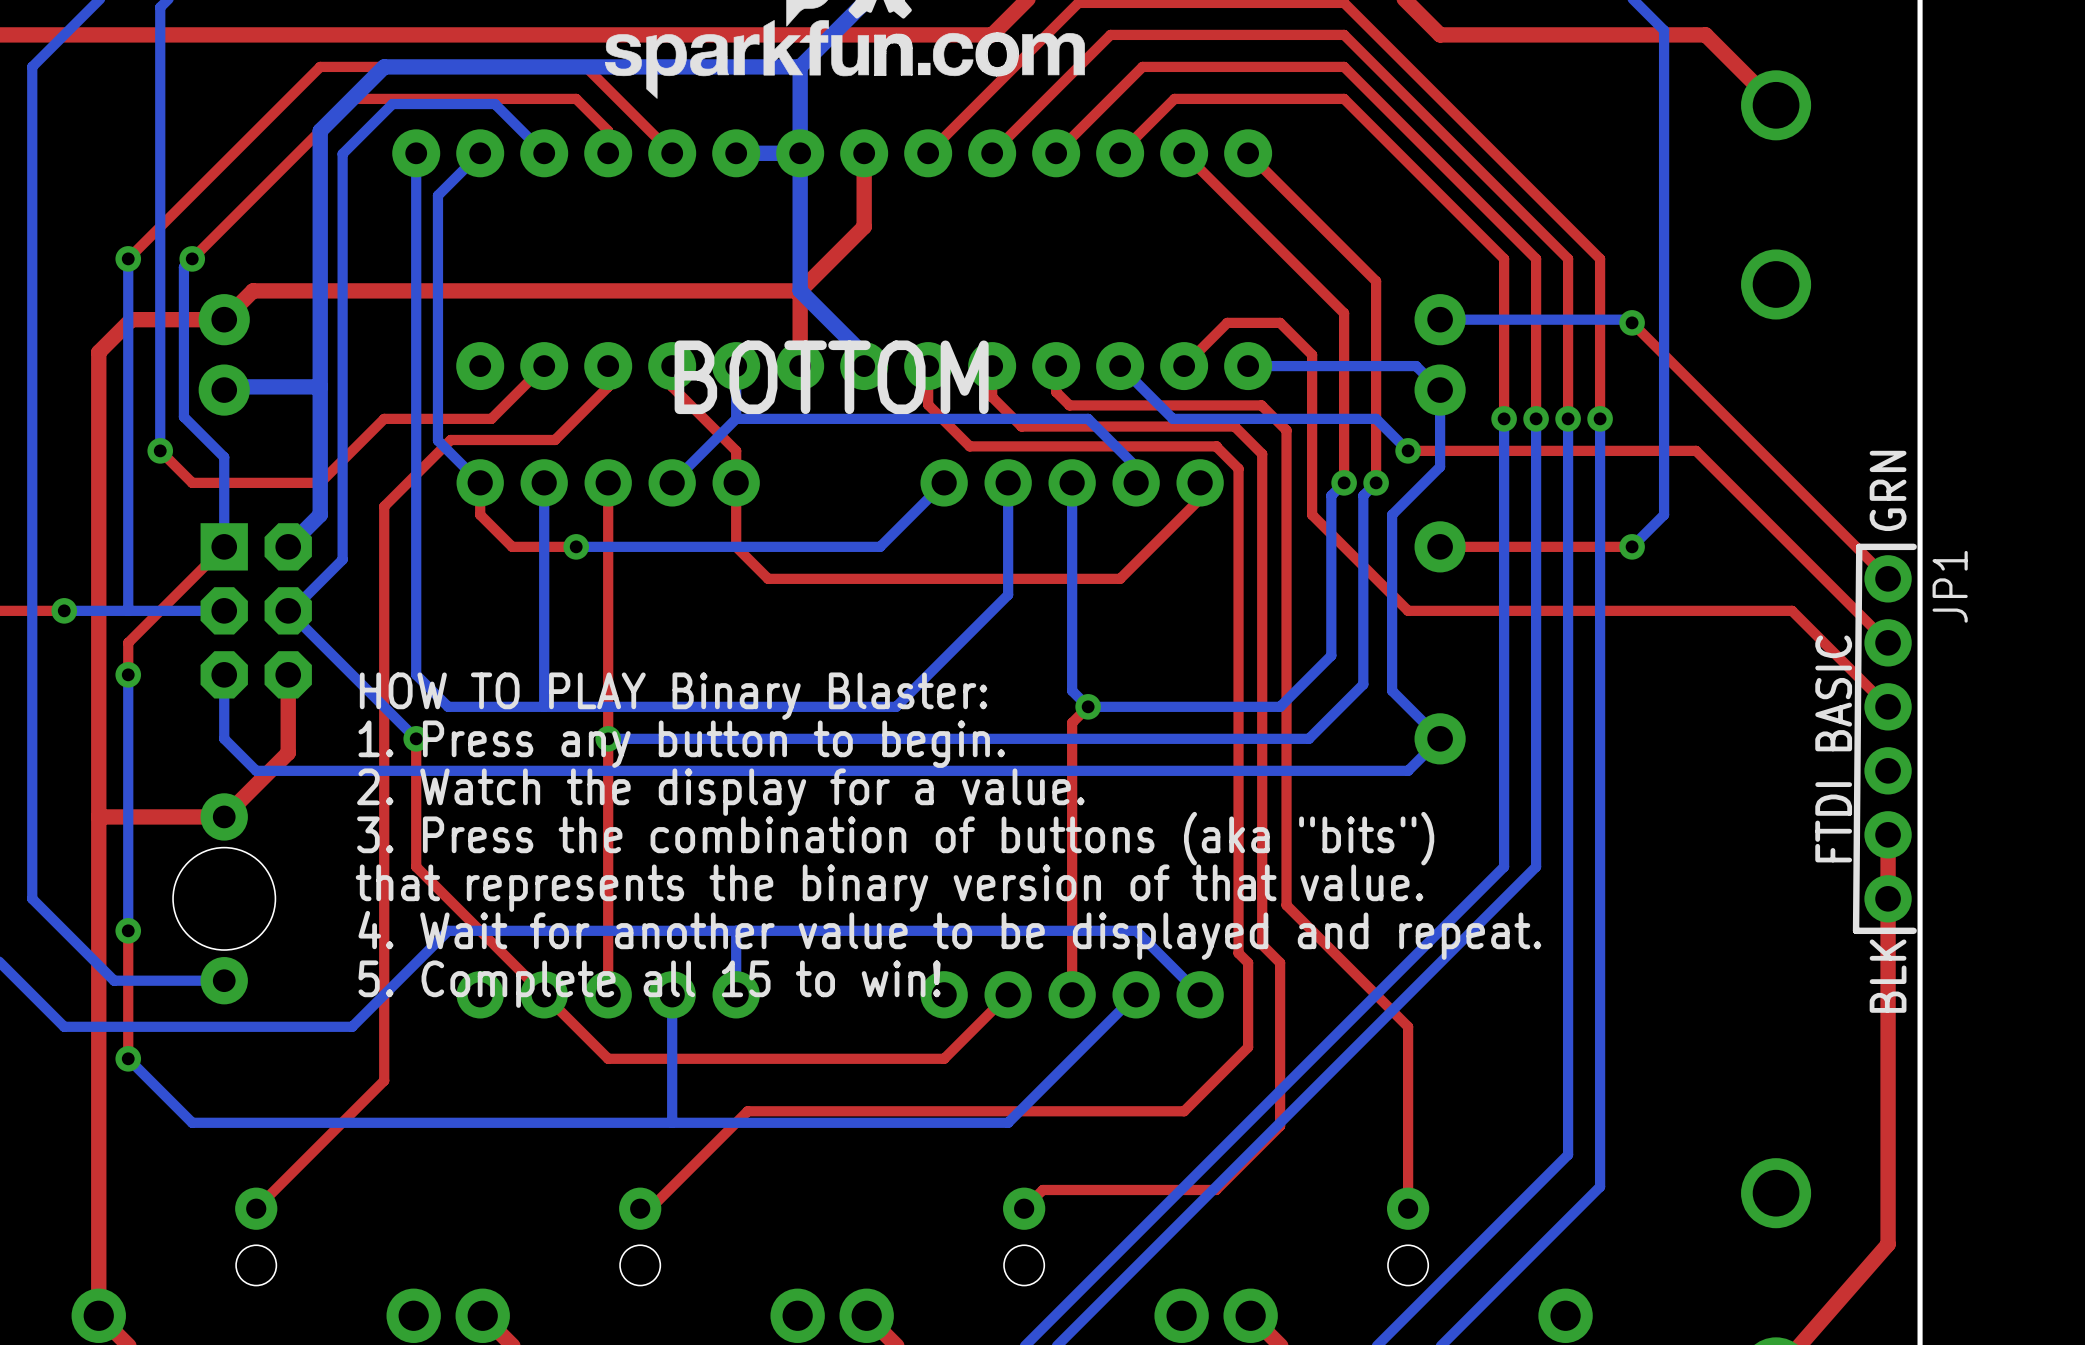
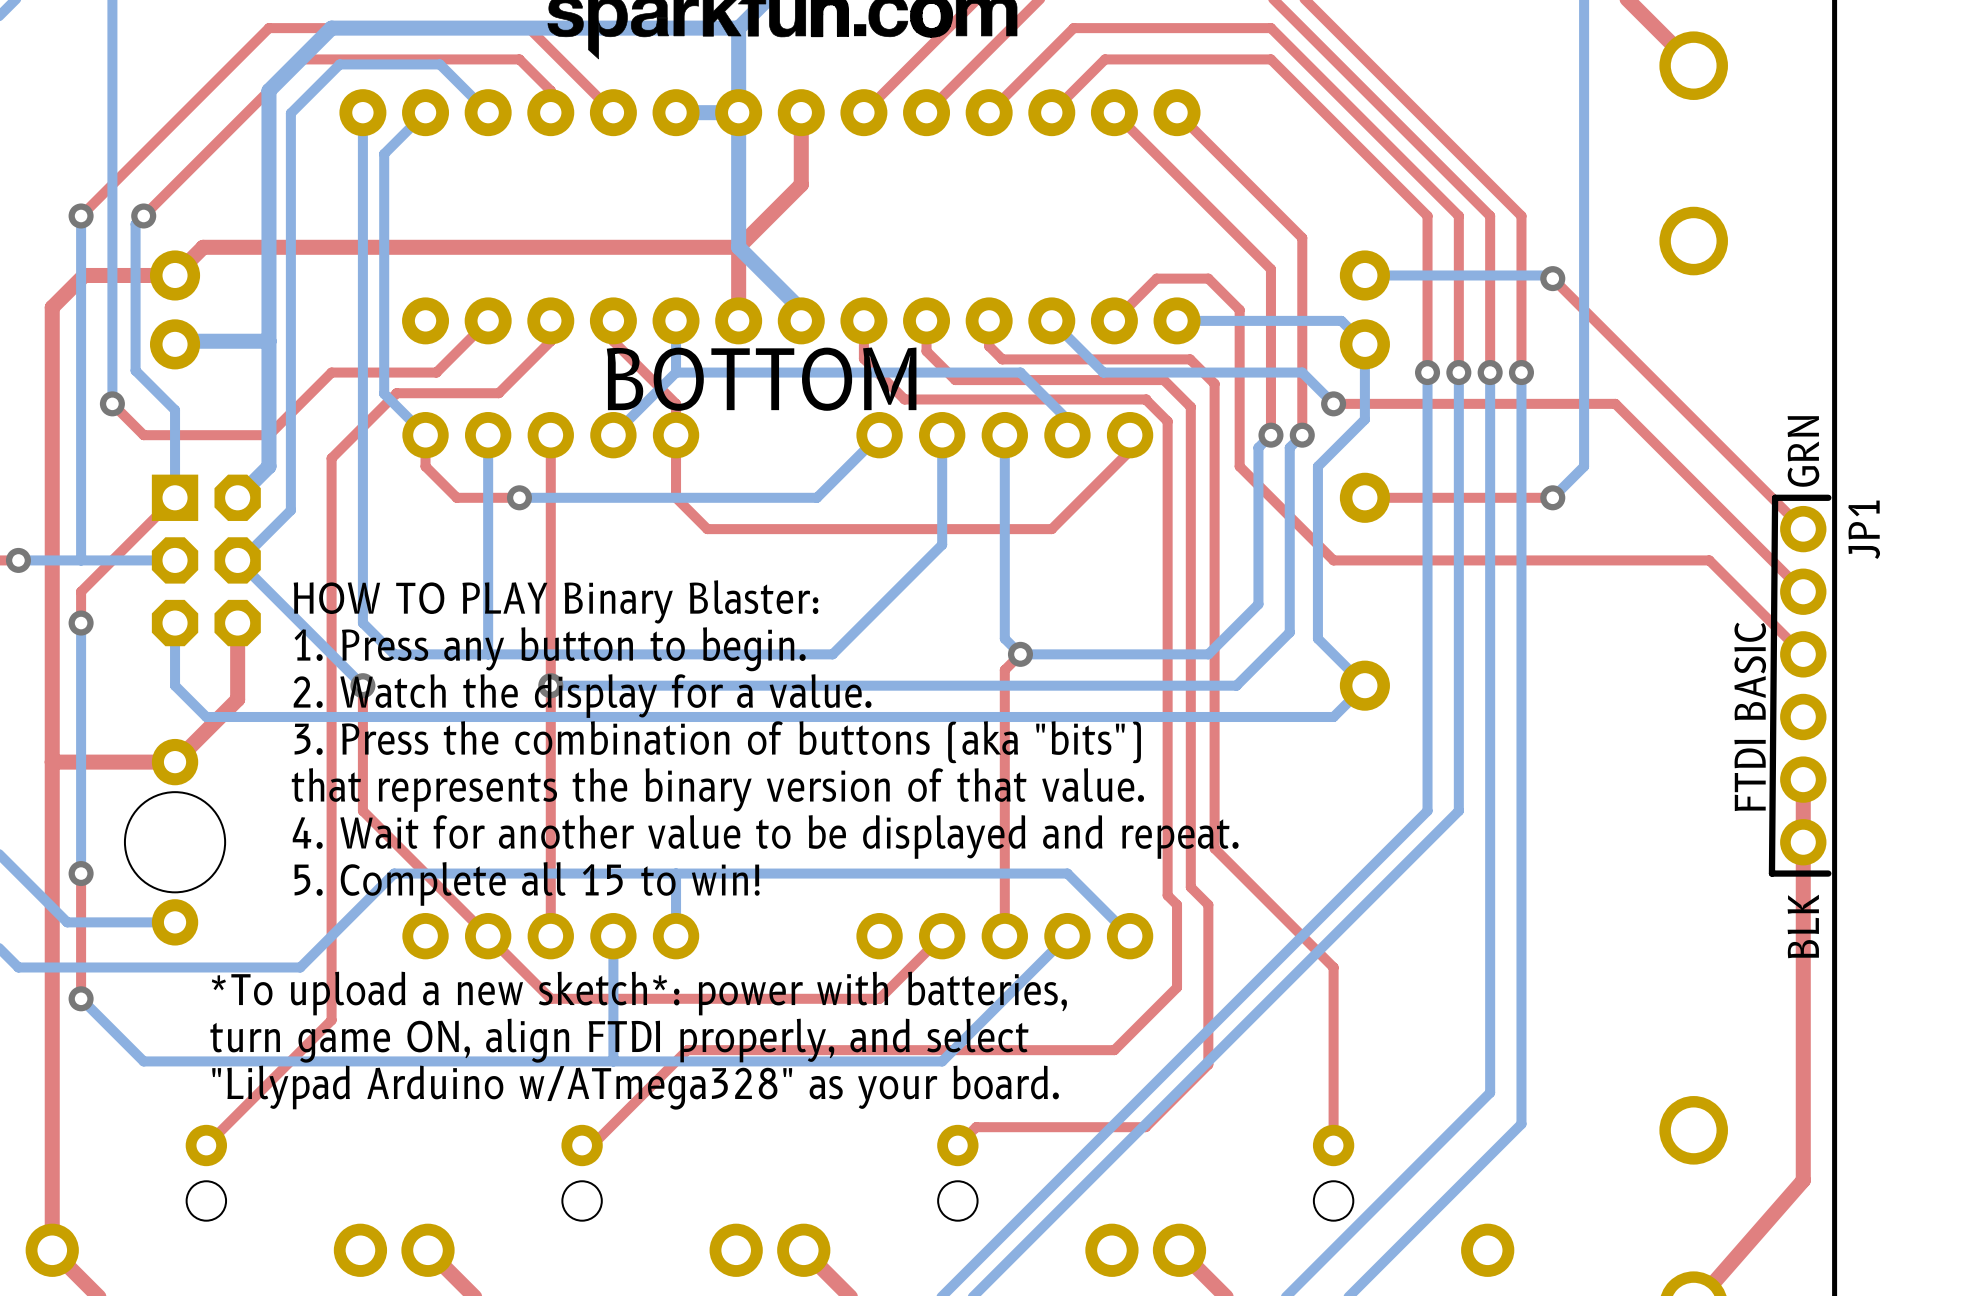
text position: BOTTOM (831, 377) -> BOTTOM (761, 379)
text position: HOW TO PLAY Binary Blaster: (673, 696) -> HOW TO PLAY Binary Blaster: (556, 601)
text position: 1. Press any button to begin. (681, 744) -> 1. Press any button to begin. (550, 649)
text position: 2. Watch the display for a value. (720, 792) -> 2. Watch the display for a value. (582, 696)
text position: 3. Press the combination of buttons (aka "bits") (895, 838) -> 3. Press the combination of buttons (aka "bits") (717, 742)
text position: that represents the binary version of that value. (889, 888) -> that represents the binary version of that value. (717, 789)
text position: 4. Wait for another value to be displayed and repeat. (949, 935) -> 4. Wait for another value to be displayed and repeat. (765, 836)
text position: 5. Complete all 15 to win! (649, 984) -> 5. Complete all 15 to win! (527, 883)
text: none -> *To upload a new sketch*: power with batteries, (639, 993)
text: none -> turn game ON, align FTDI properly, and select (619, 1040)
text: none -> "Lilypad Arduino w/ATmega328" as your board. (635, 1087)

